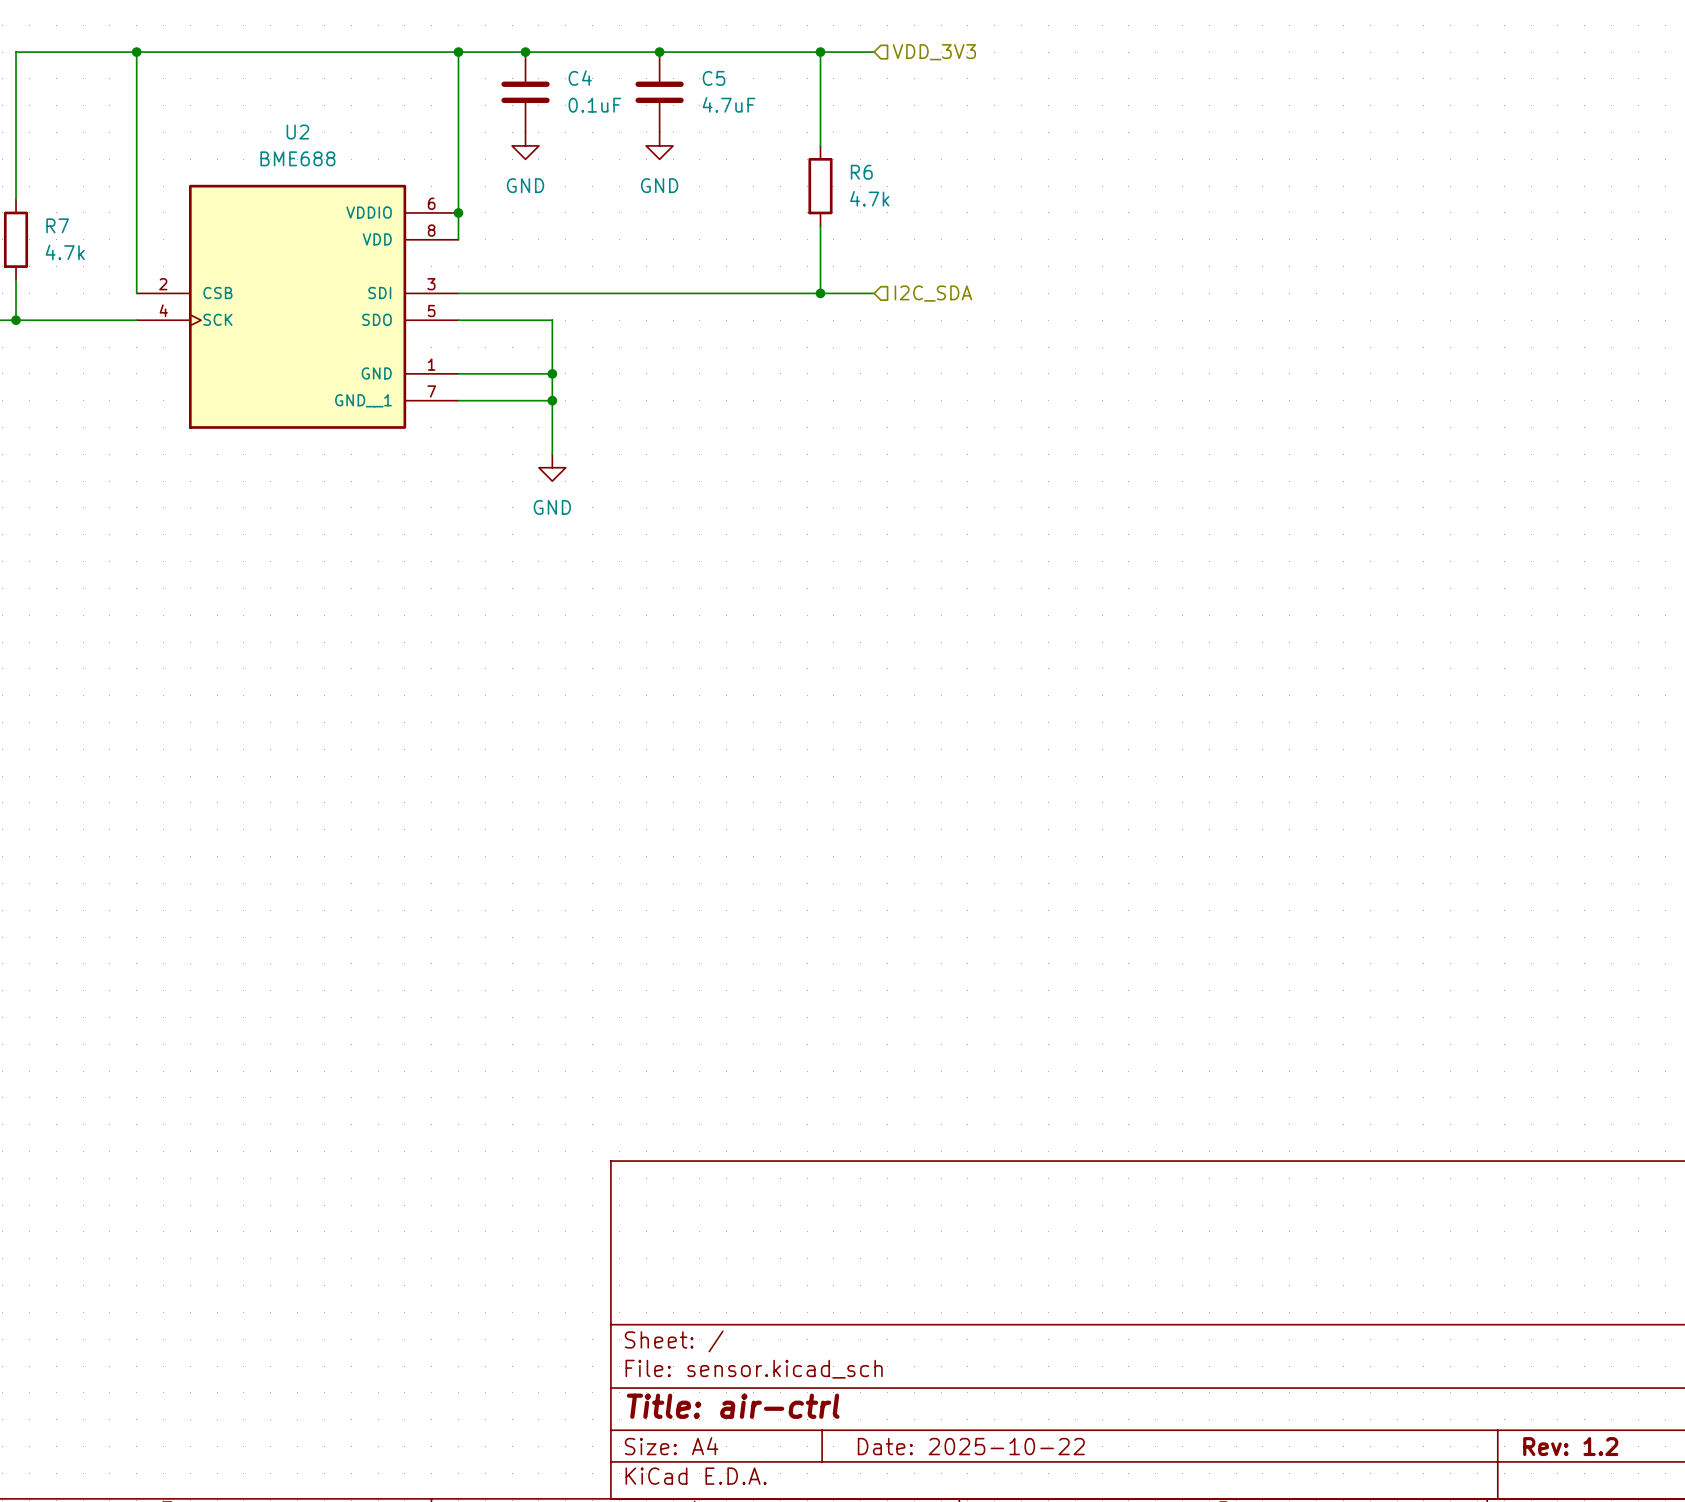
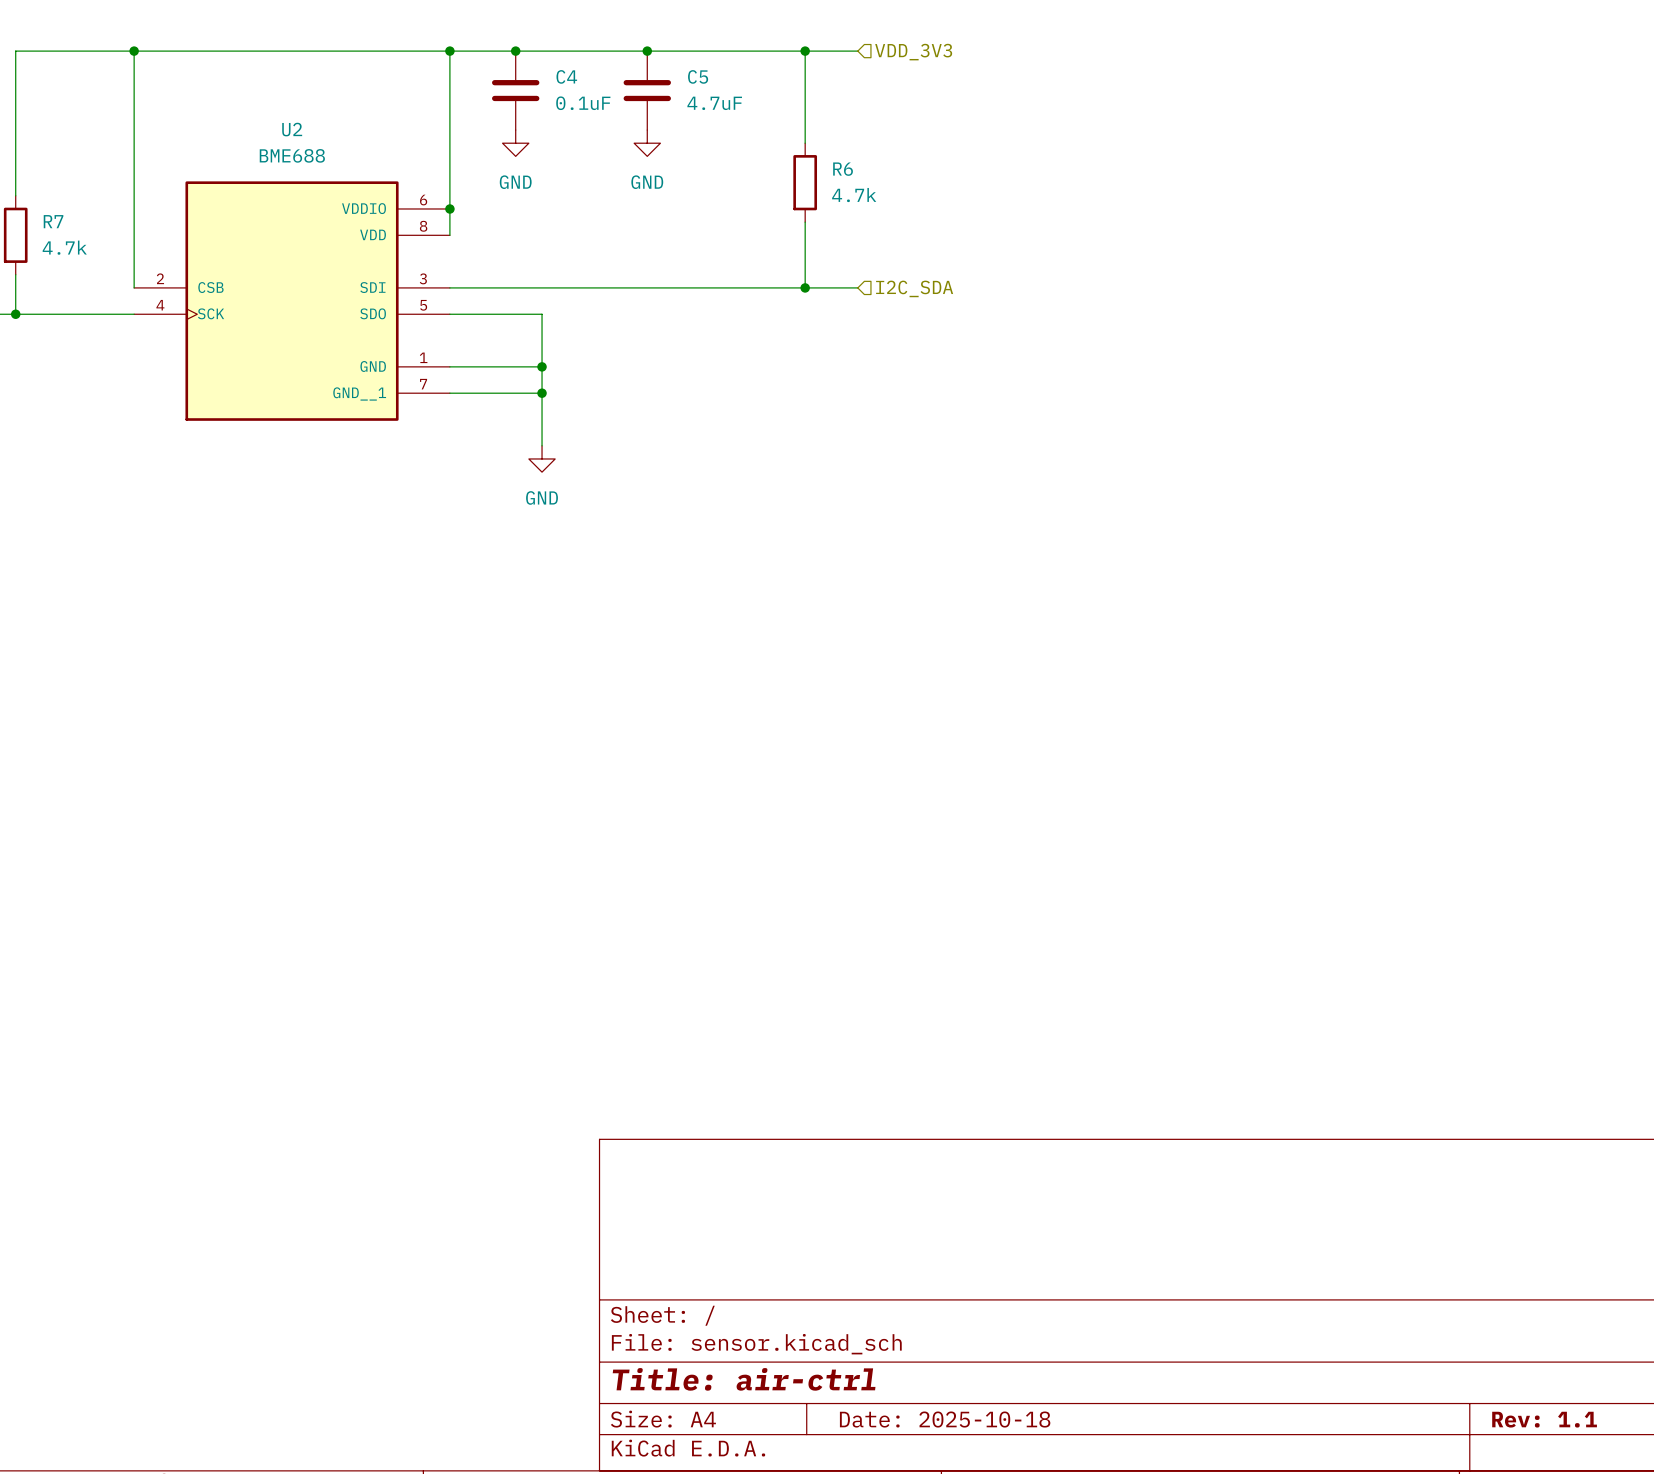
title block: Date: 2025-10-22 (971, 1446) -> Date: 2025-10-18 (945, 1419)
title block: Rev: 1.2 (1570, 1446) -> Rev: 1.1 (1544, 1419)

